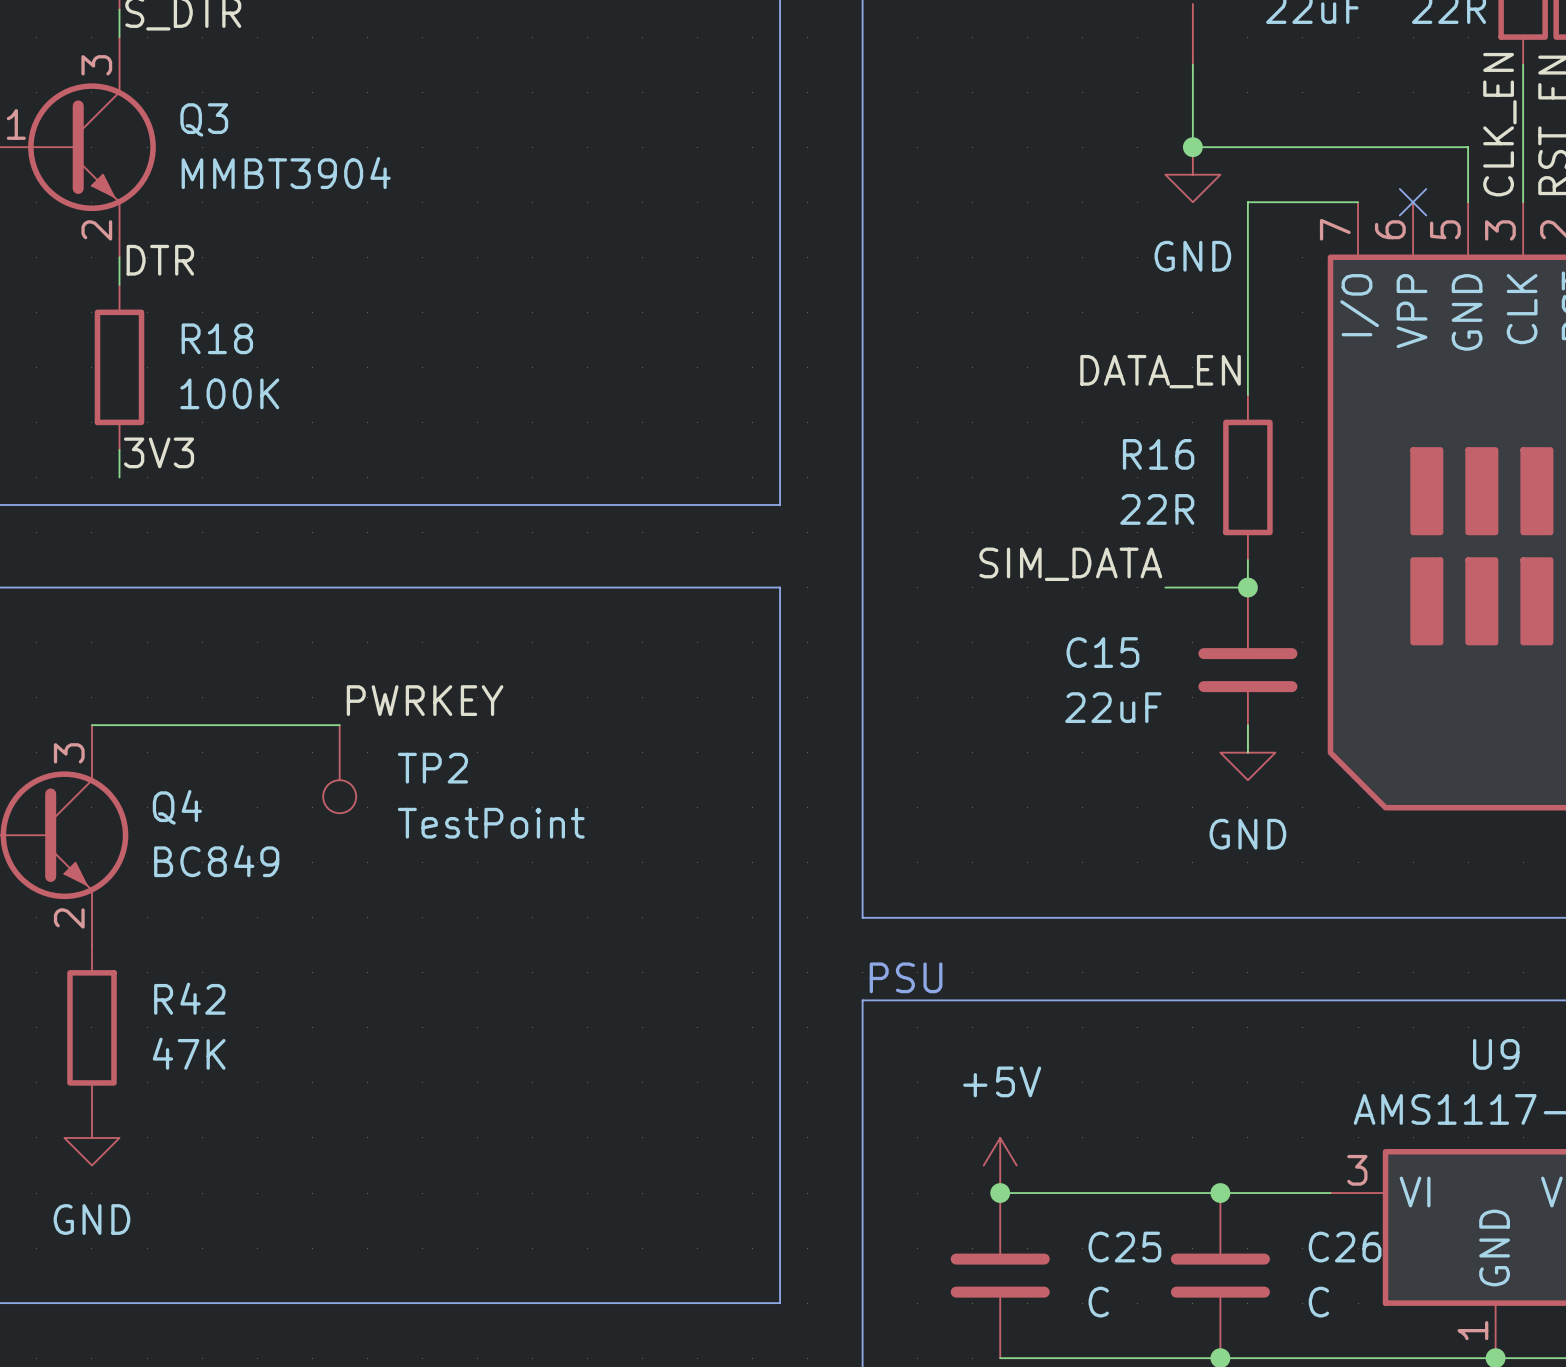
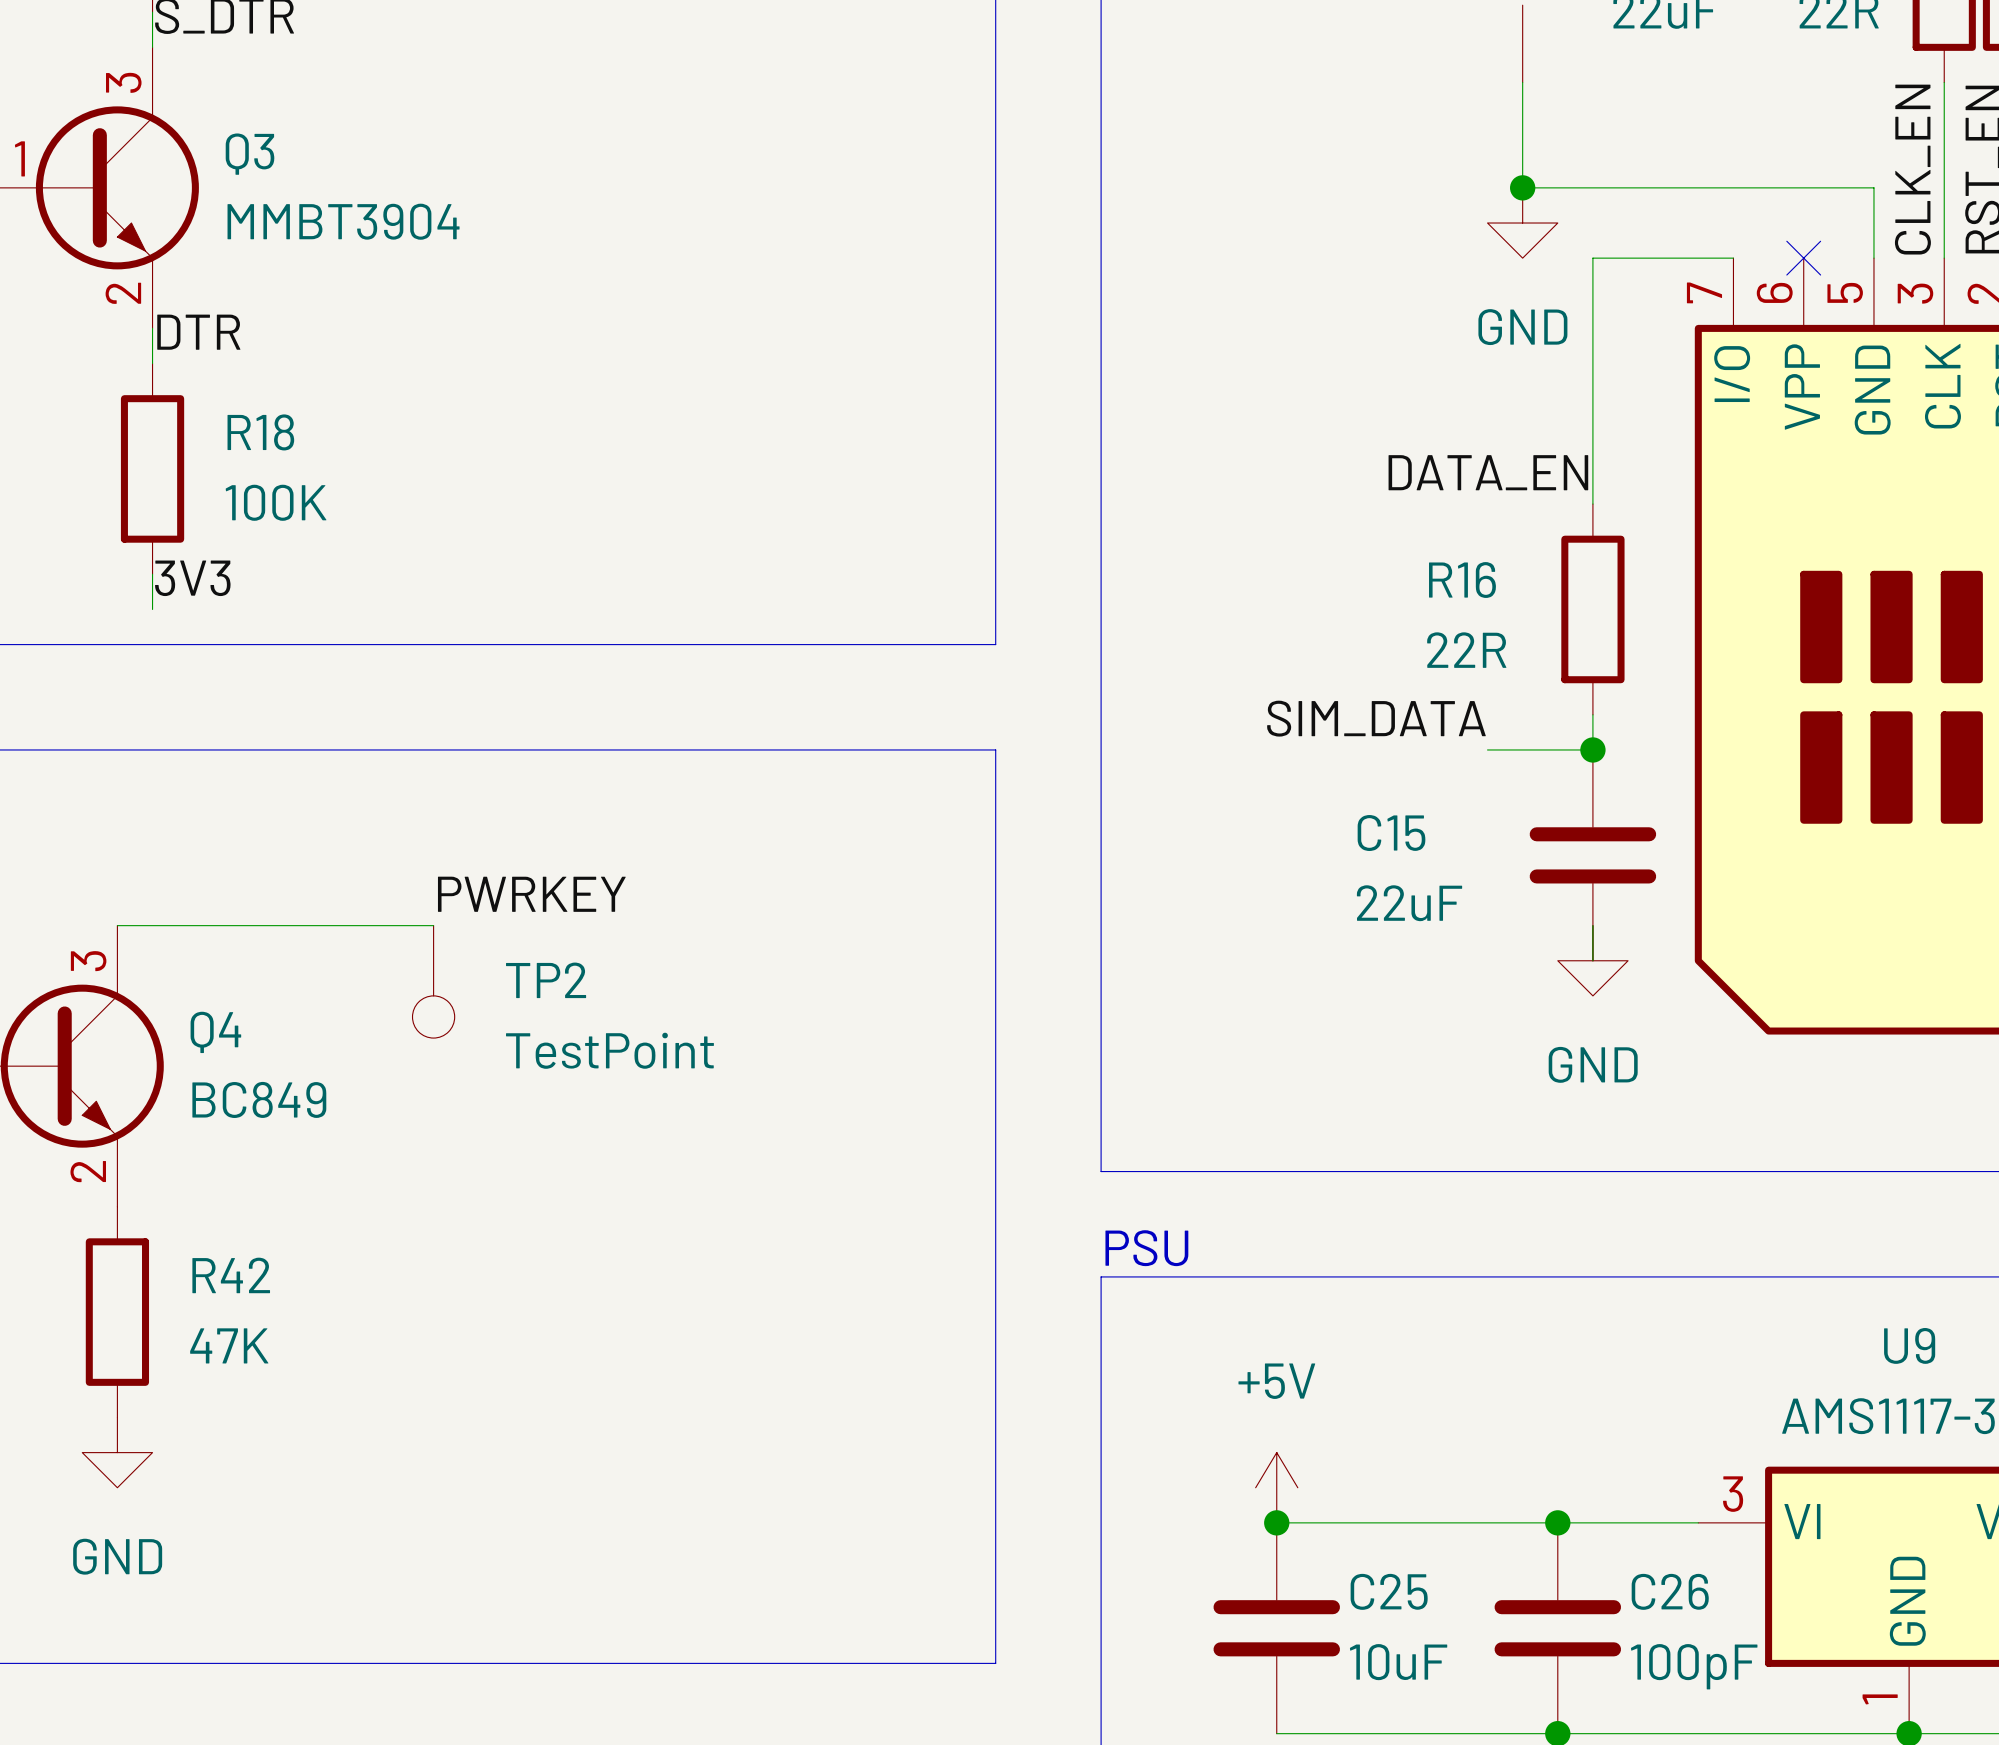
C25 name position: C25 (1124, 1247) -> C25 (1389, 1591)
C26 name position: C26 (1345, 1247) -> C26 (1670, 1591)
C25 value: C (1098, 1302) -> 10uF (1398, 1662)
C26 value: C (1318, 1302) -> 100pF (1694, 1666)

